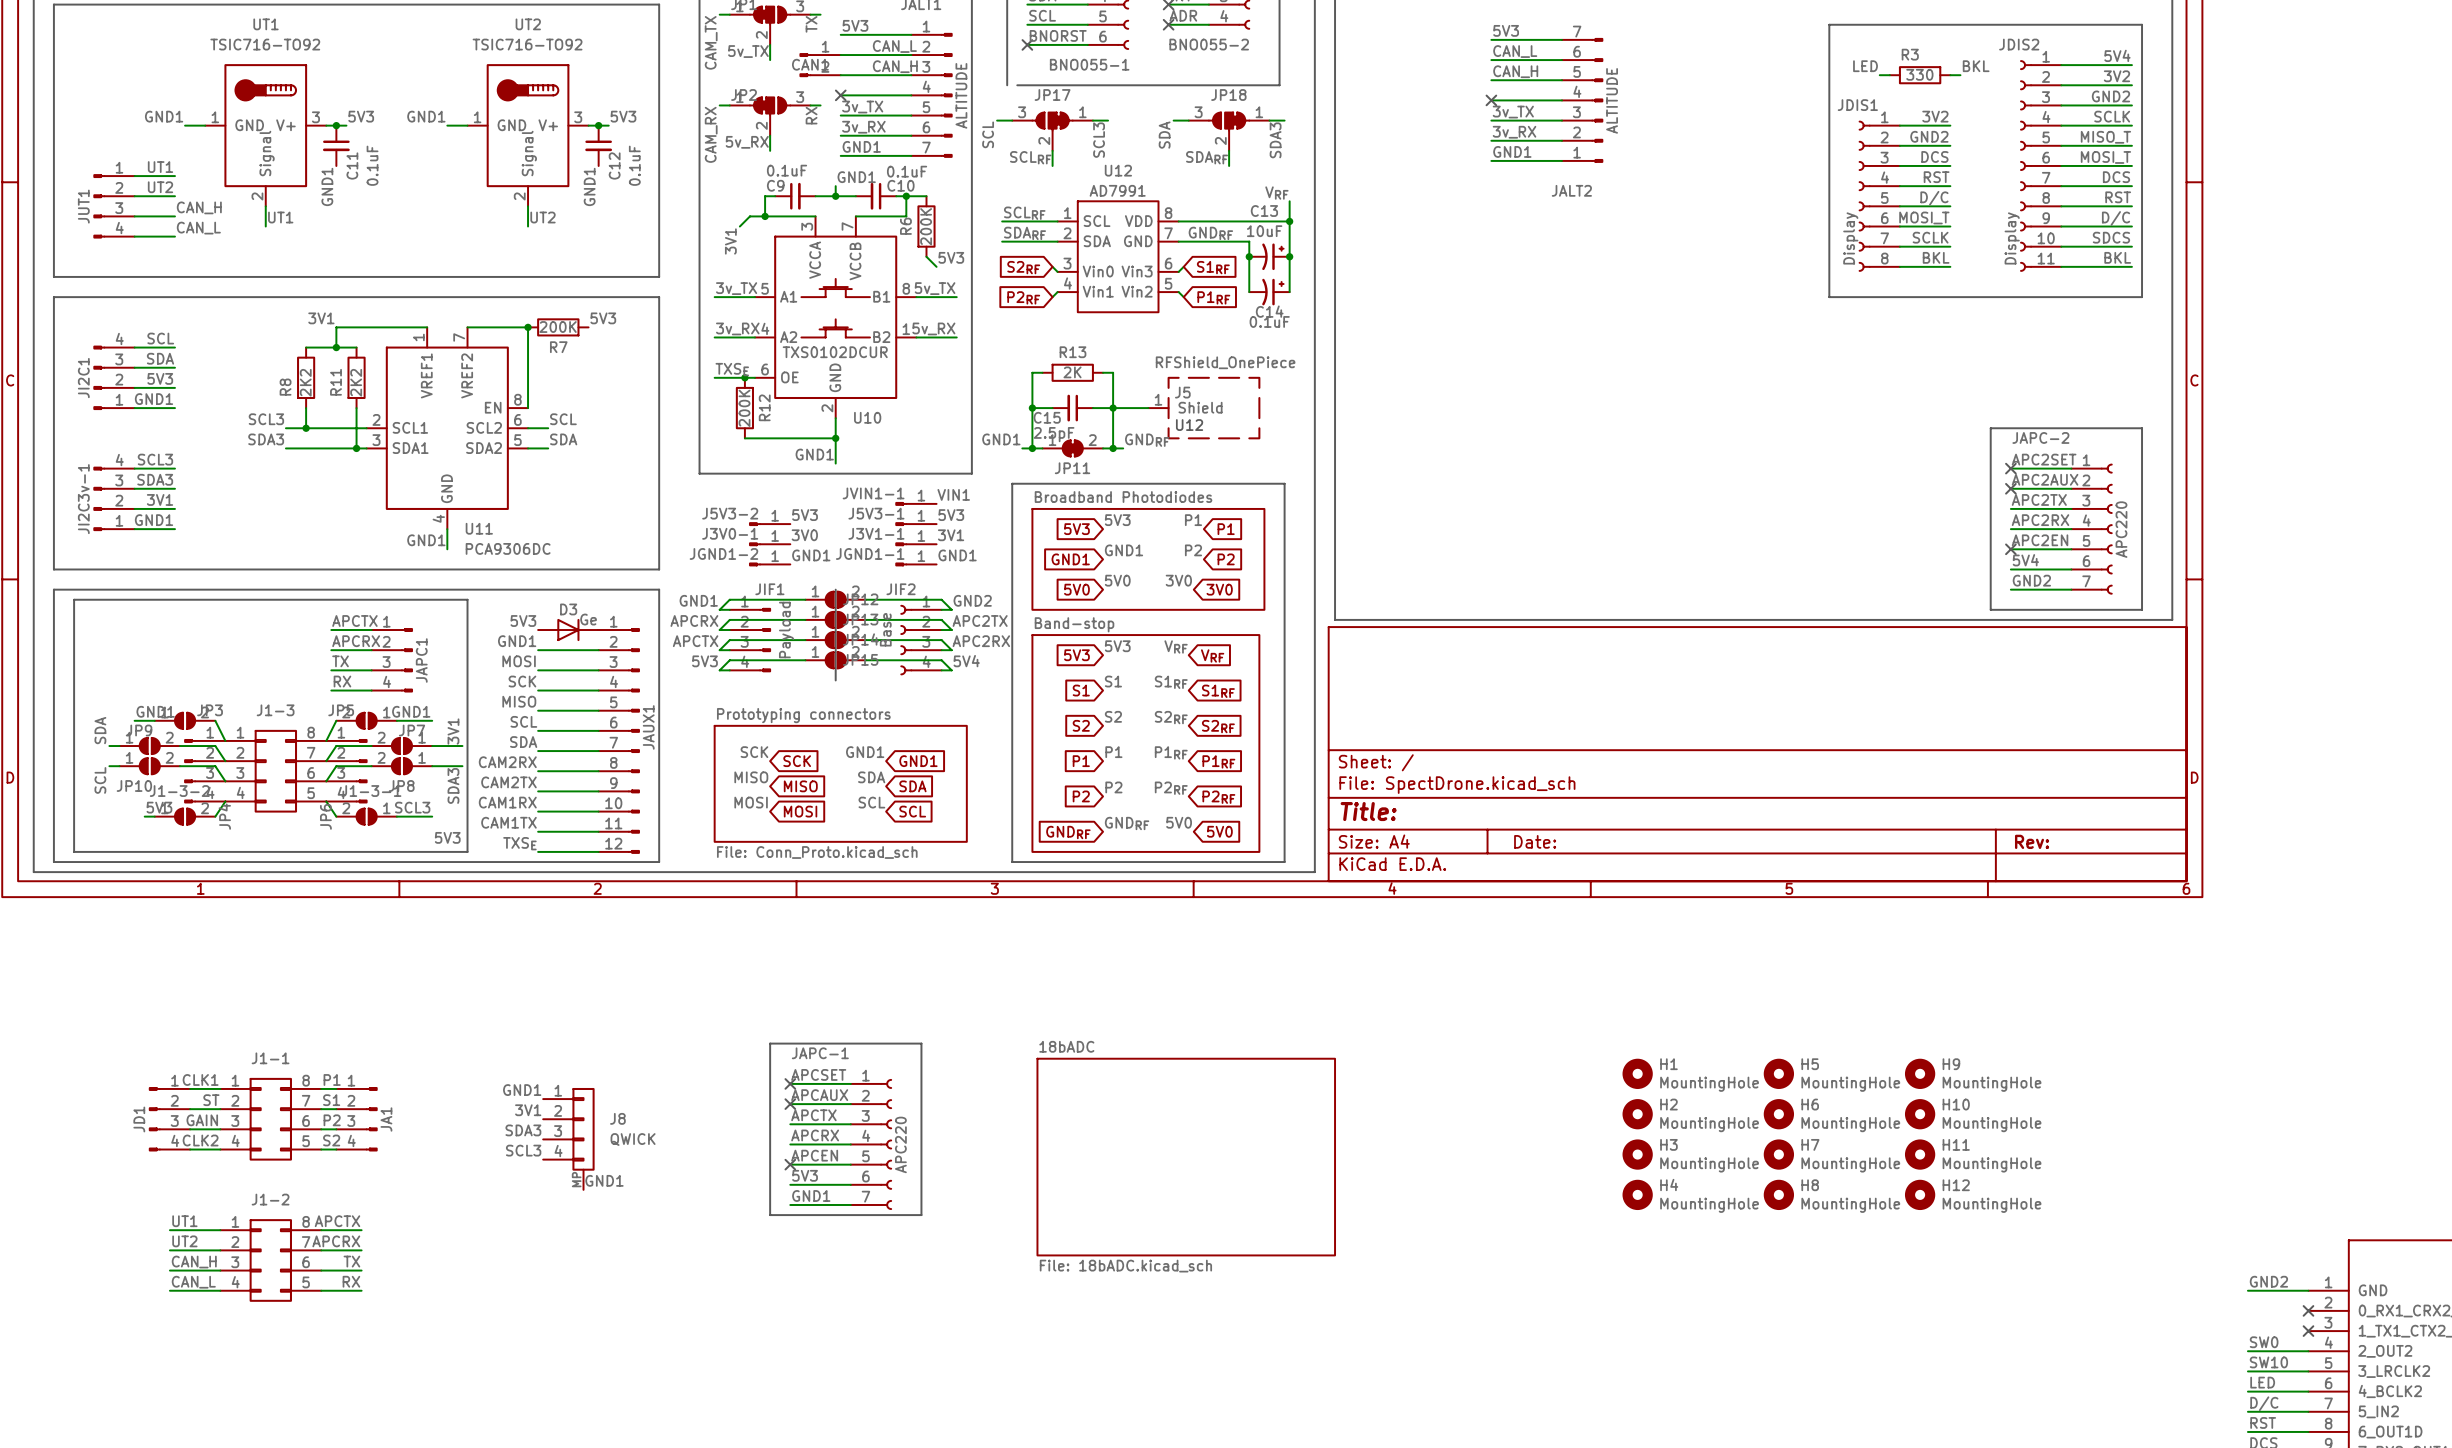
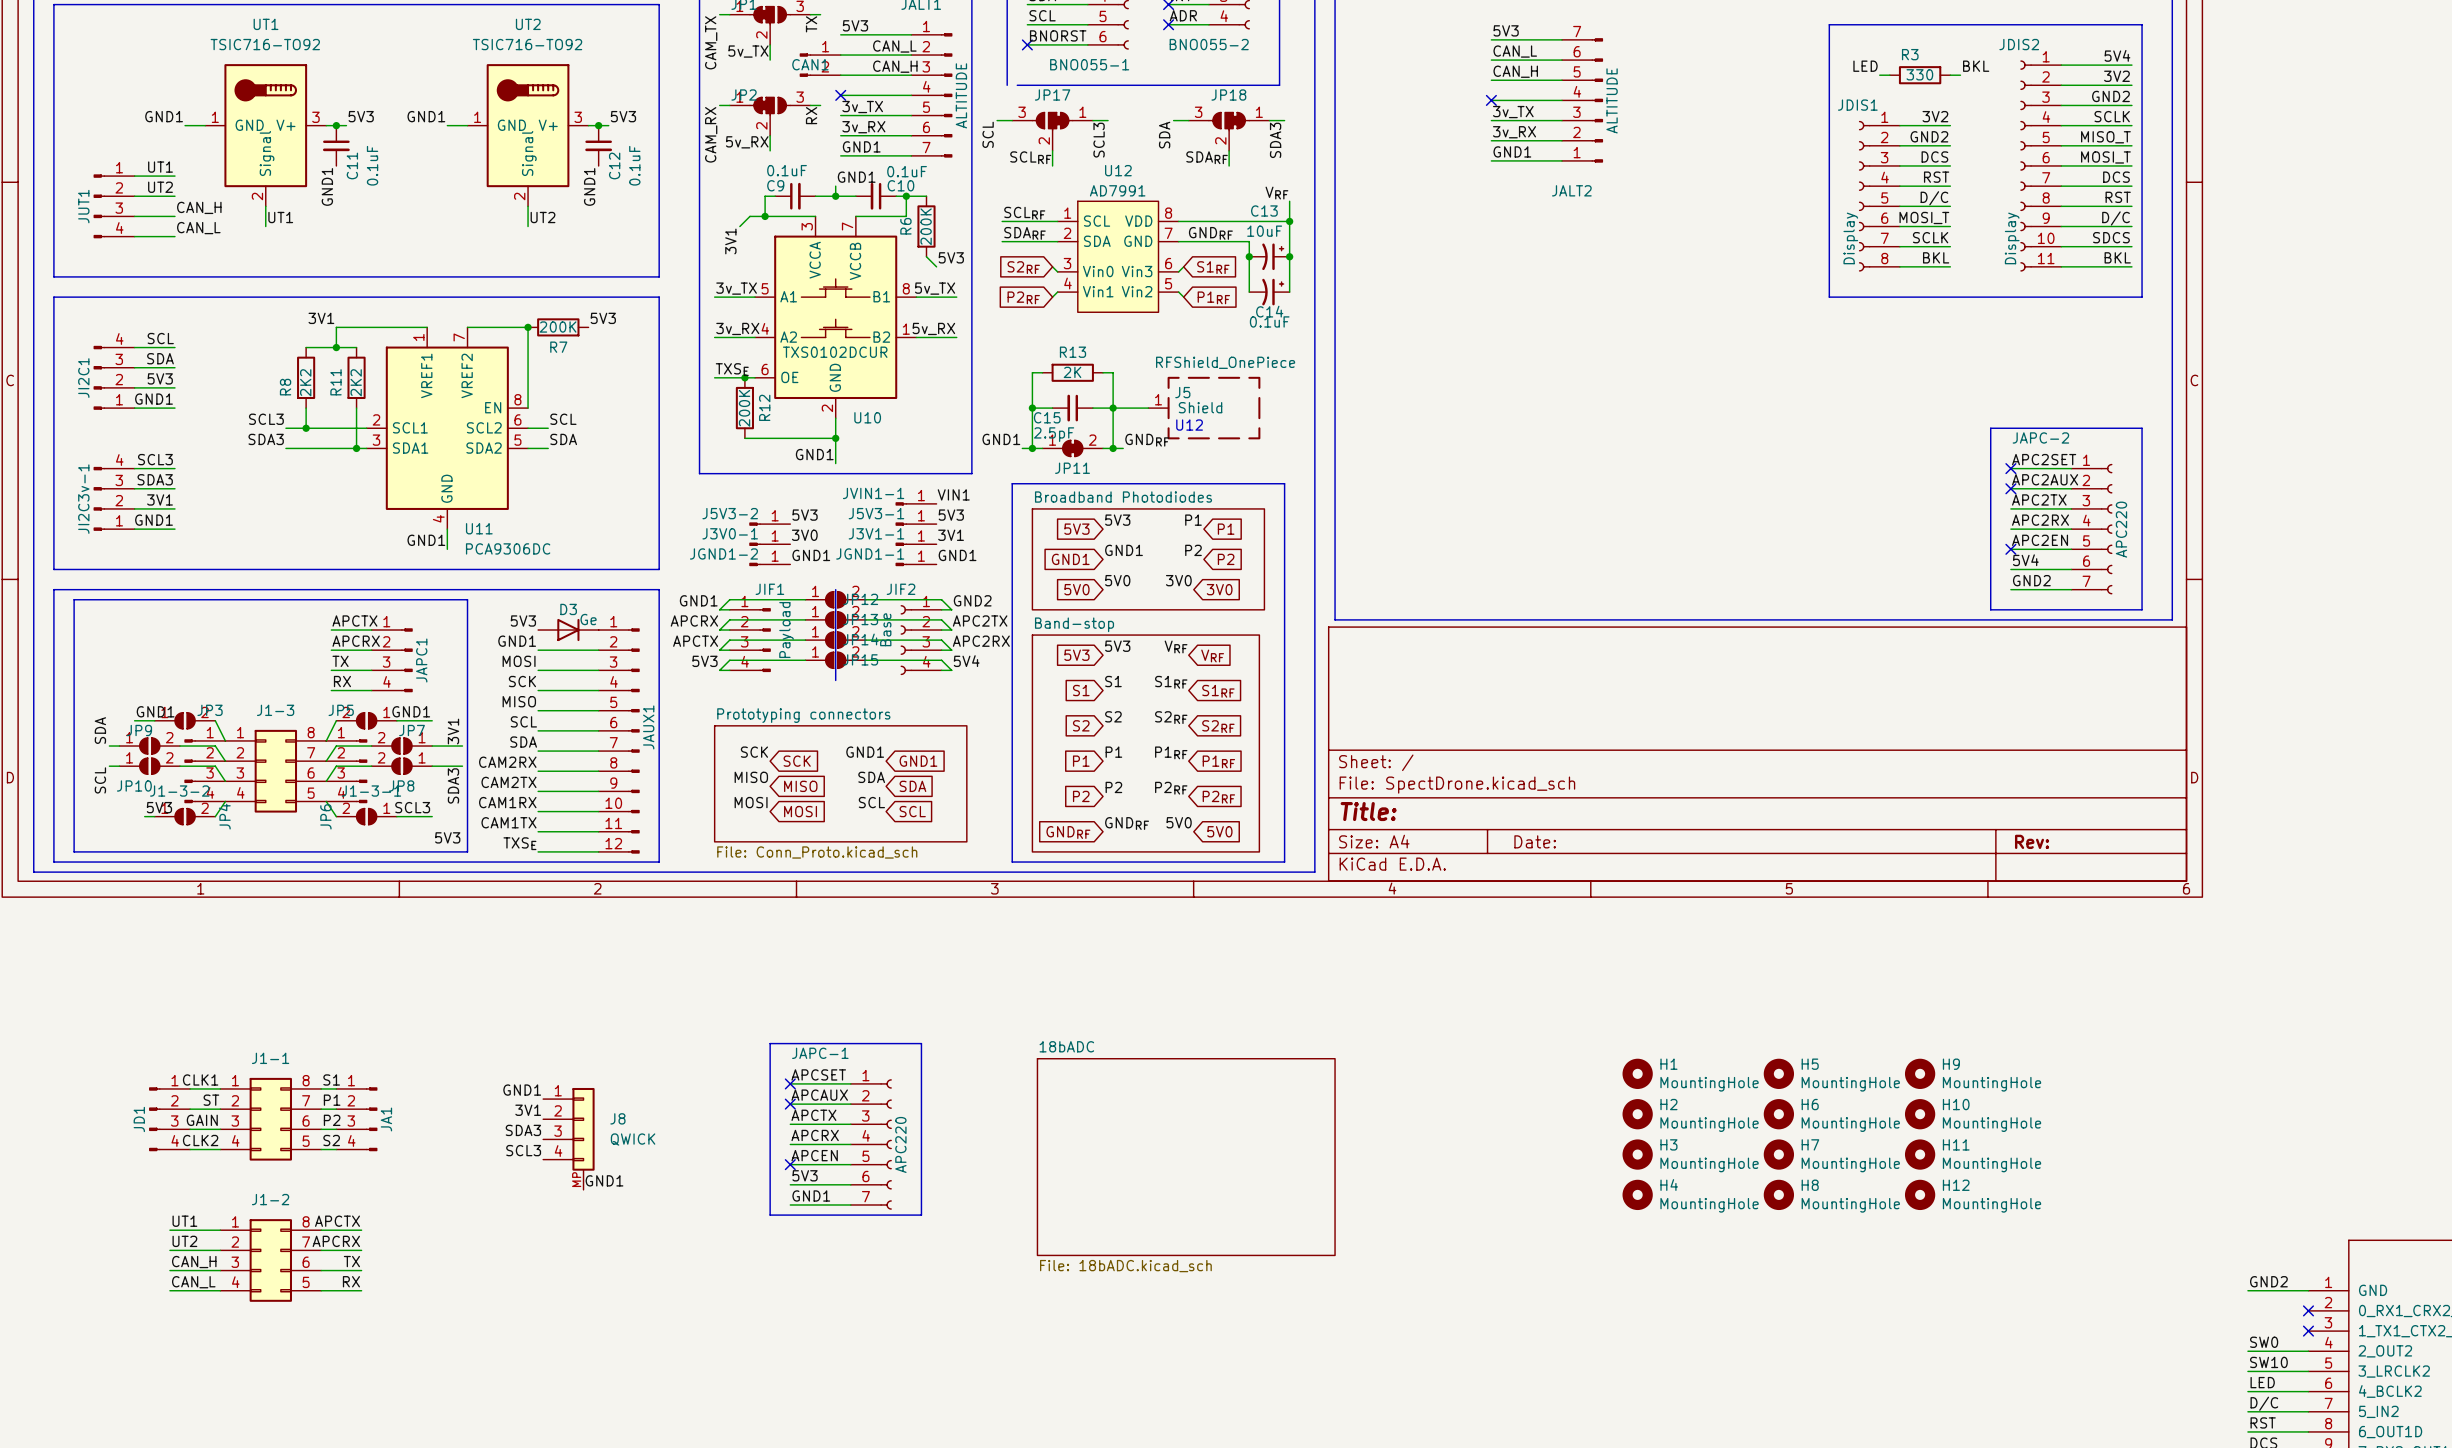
label: P1 (332, 1079) -> S1 (331, 1079)
label: S1 (331, 1100) -> P1 (332, 1100)

